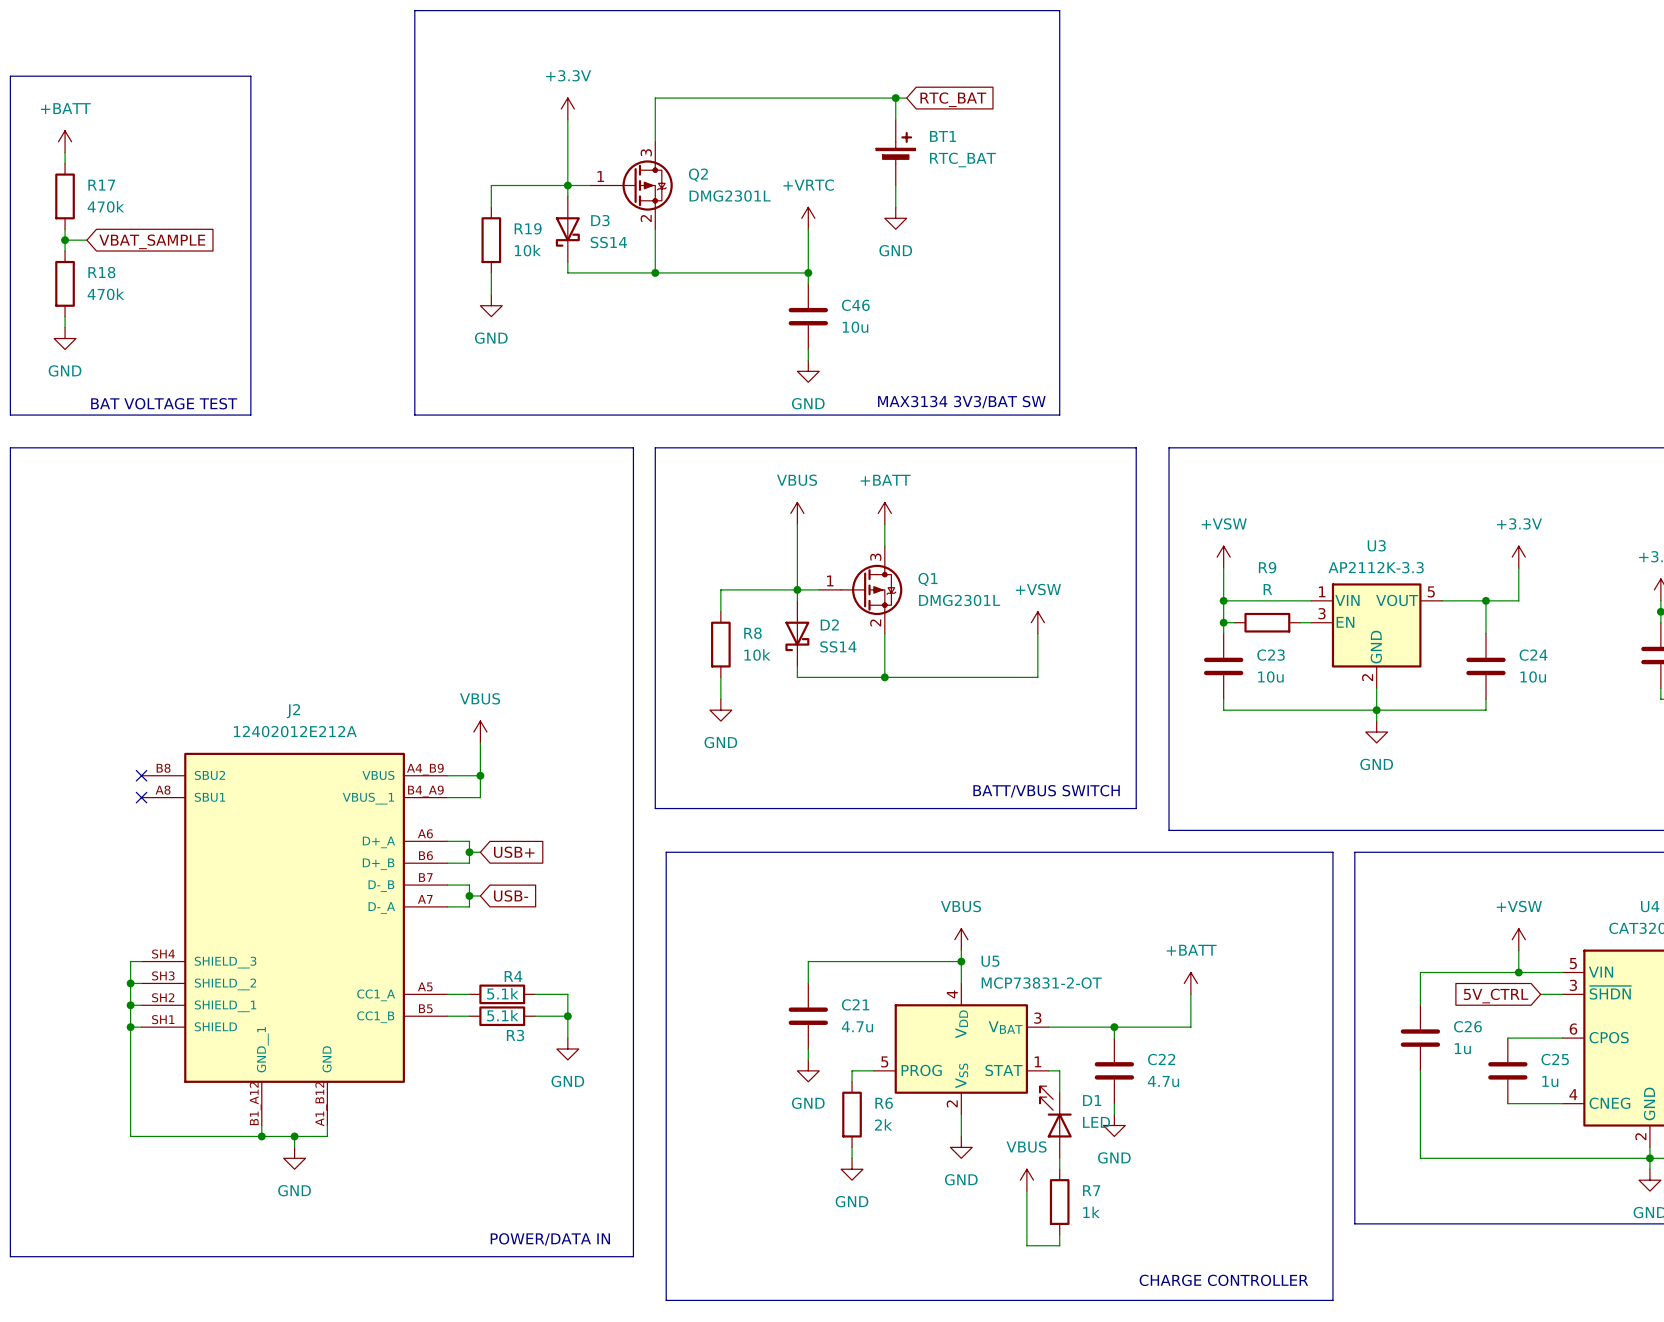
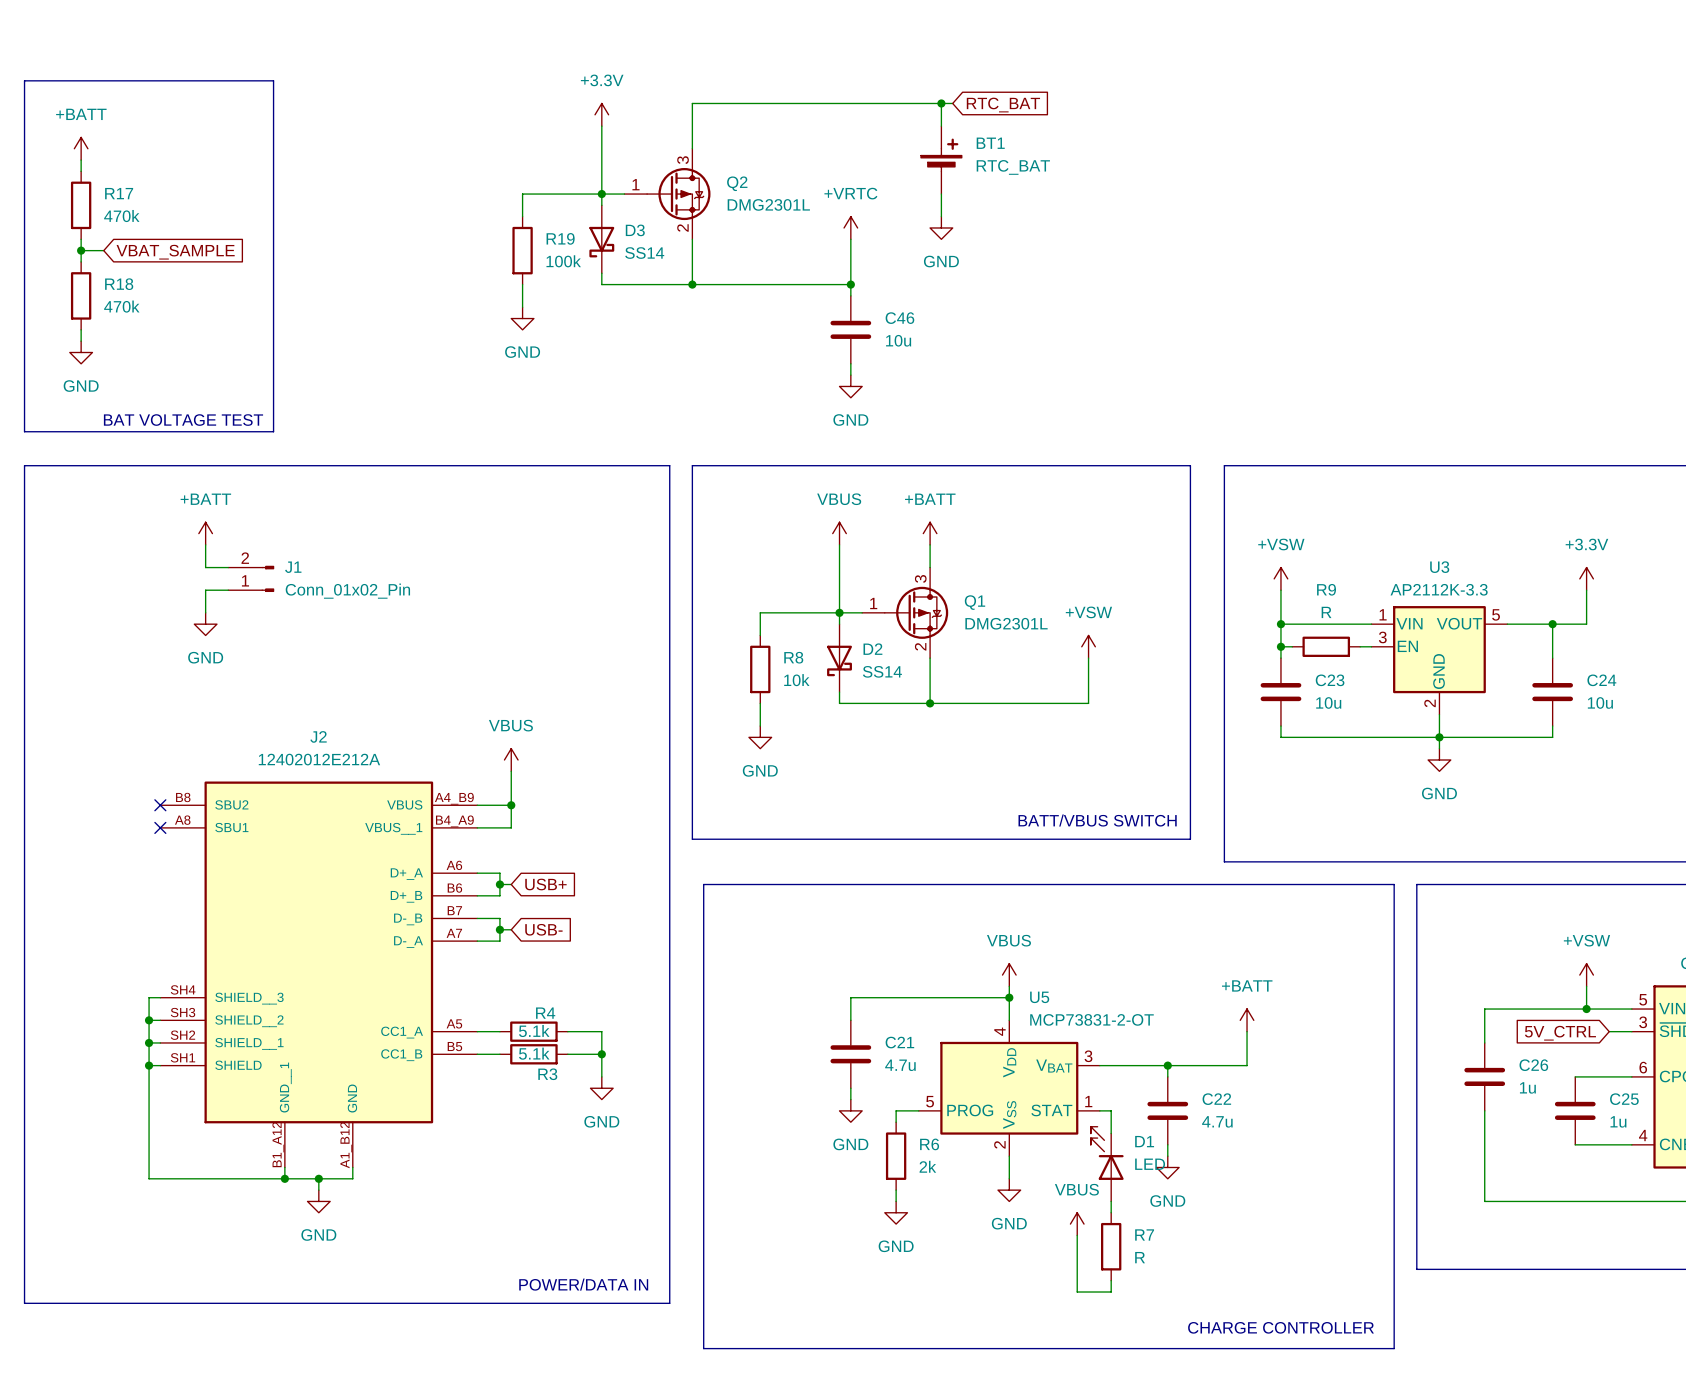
line: (414, 10) (1059, 10) (1059, 415) (414, 415) (414, 10) -> none
R19 value: 10k (527, 250) -> 100k (563, 261)
text: MAX3134 3V3/BAT SW (961, 402) -> none
power symbol: none -> +BATT (205, 533)
wire: none -> (205, 544) (205, 567) (228, 567)
J1: none -> Conn_01x02_Pin (251, 578)
wire: none -> (228, 590) (205, 590) (205, 612)
power symbol: none -> GND (205, 624)
R7 value: 1k (1091, 1212) -> R (1140, 1257)

